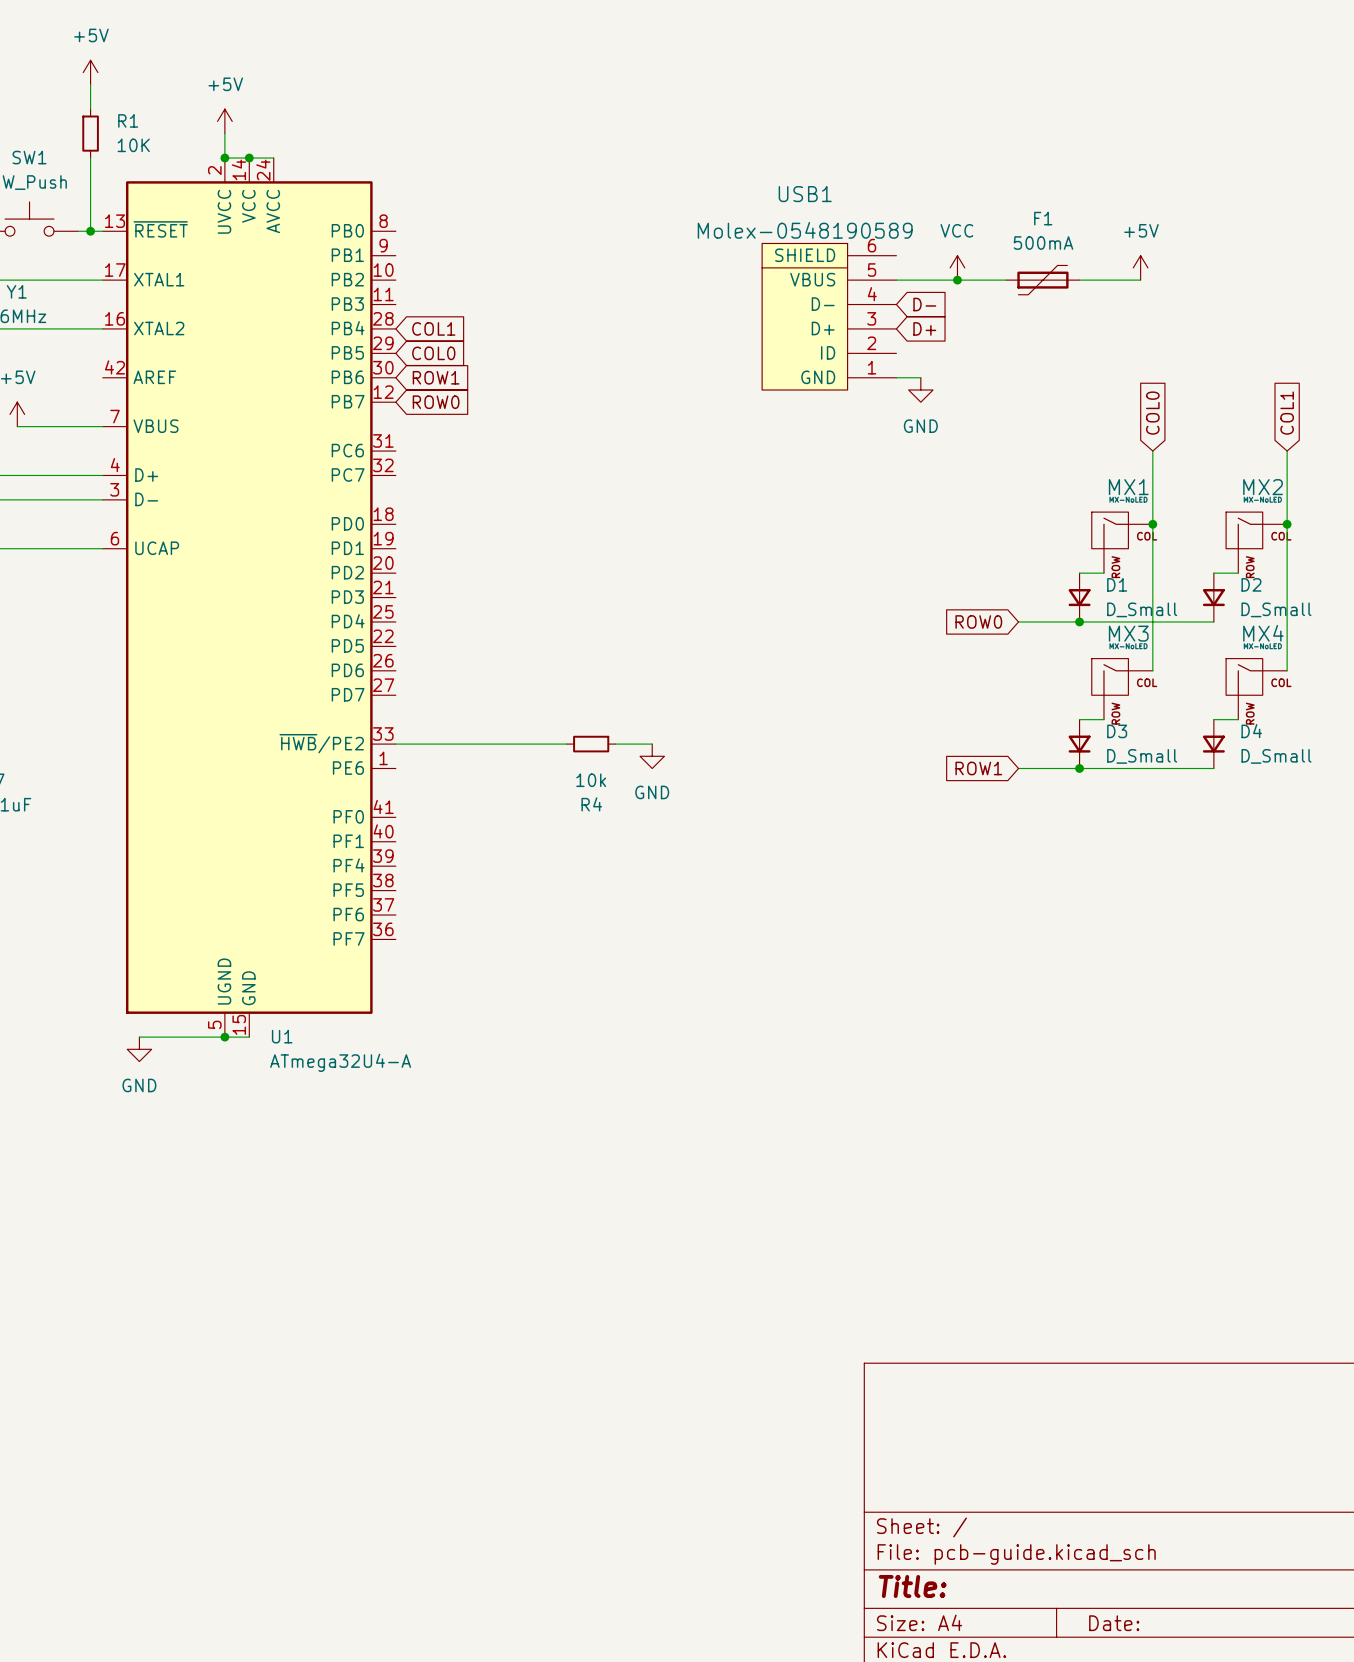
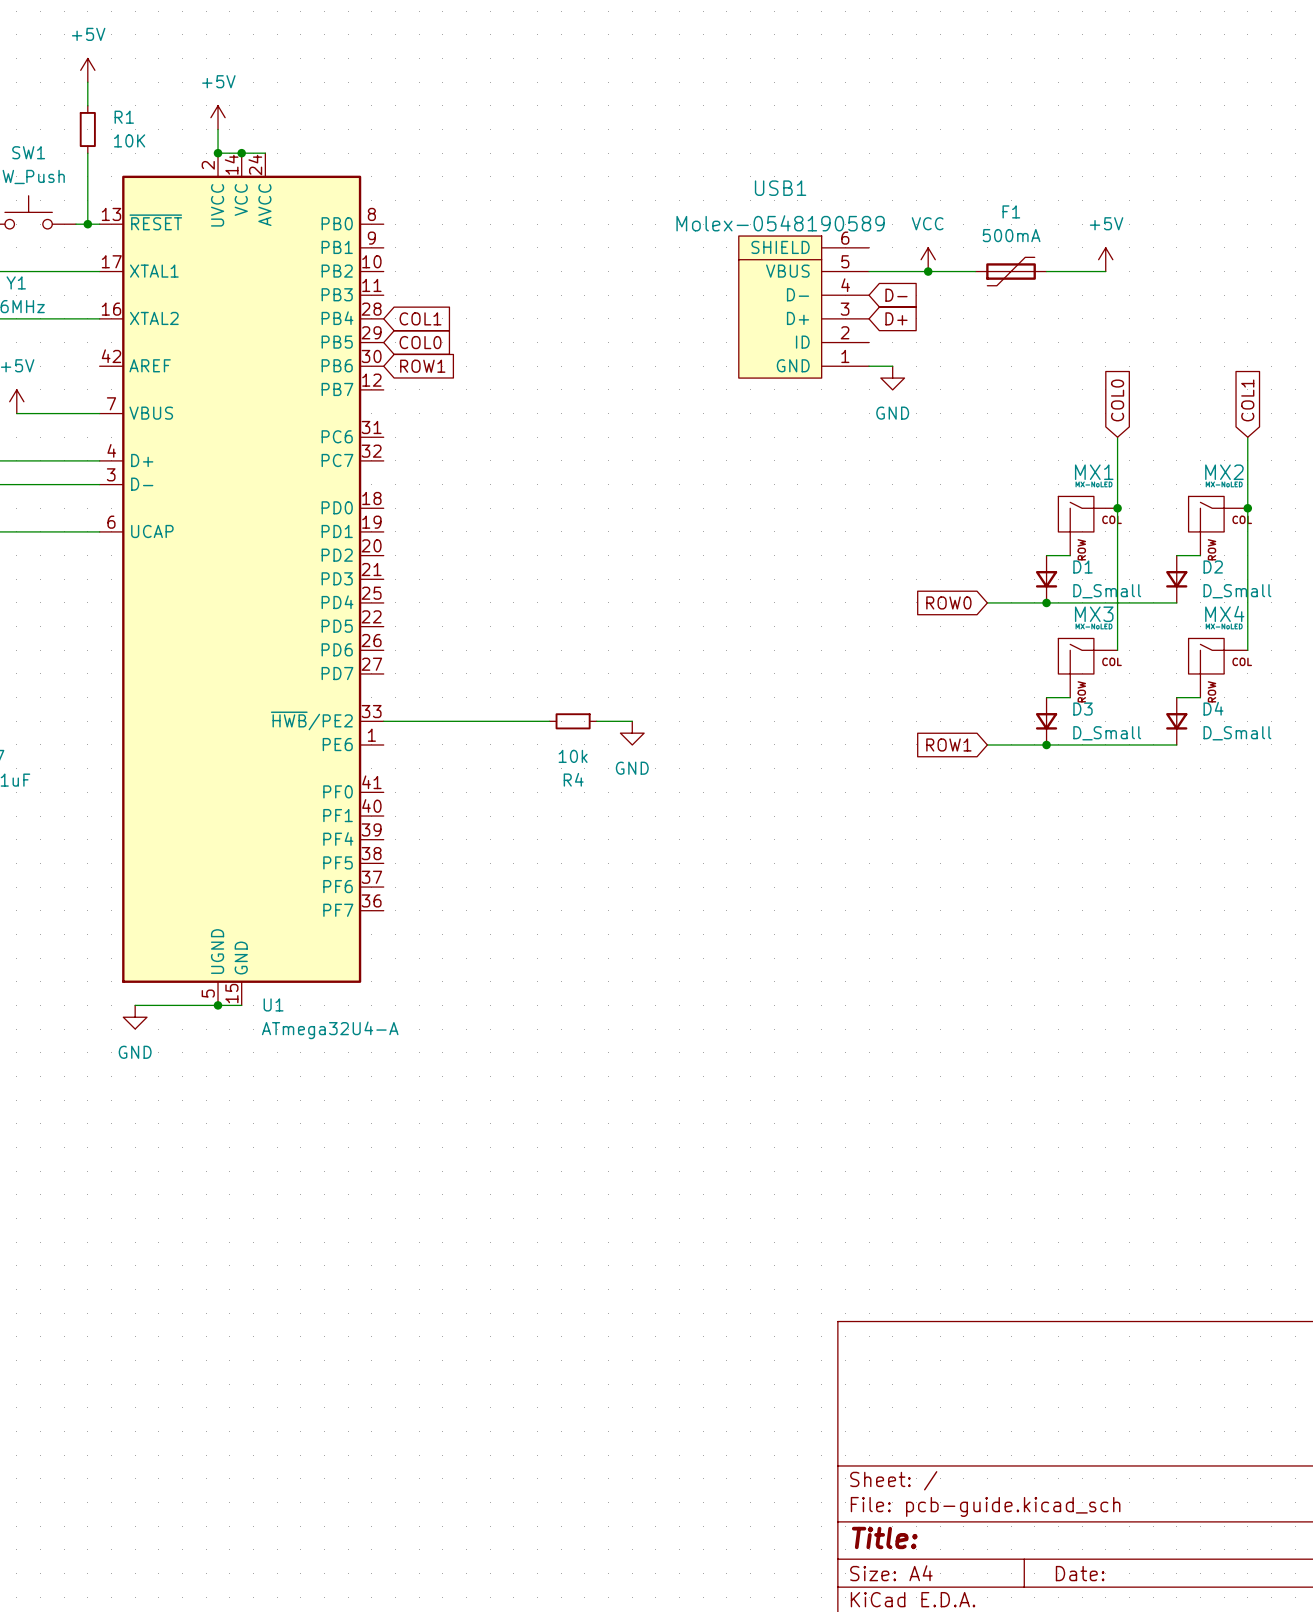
global label: ROW0 (436, 402) -> none

